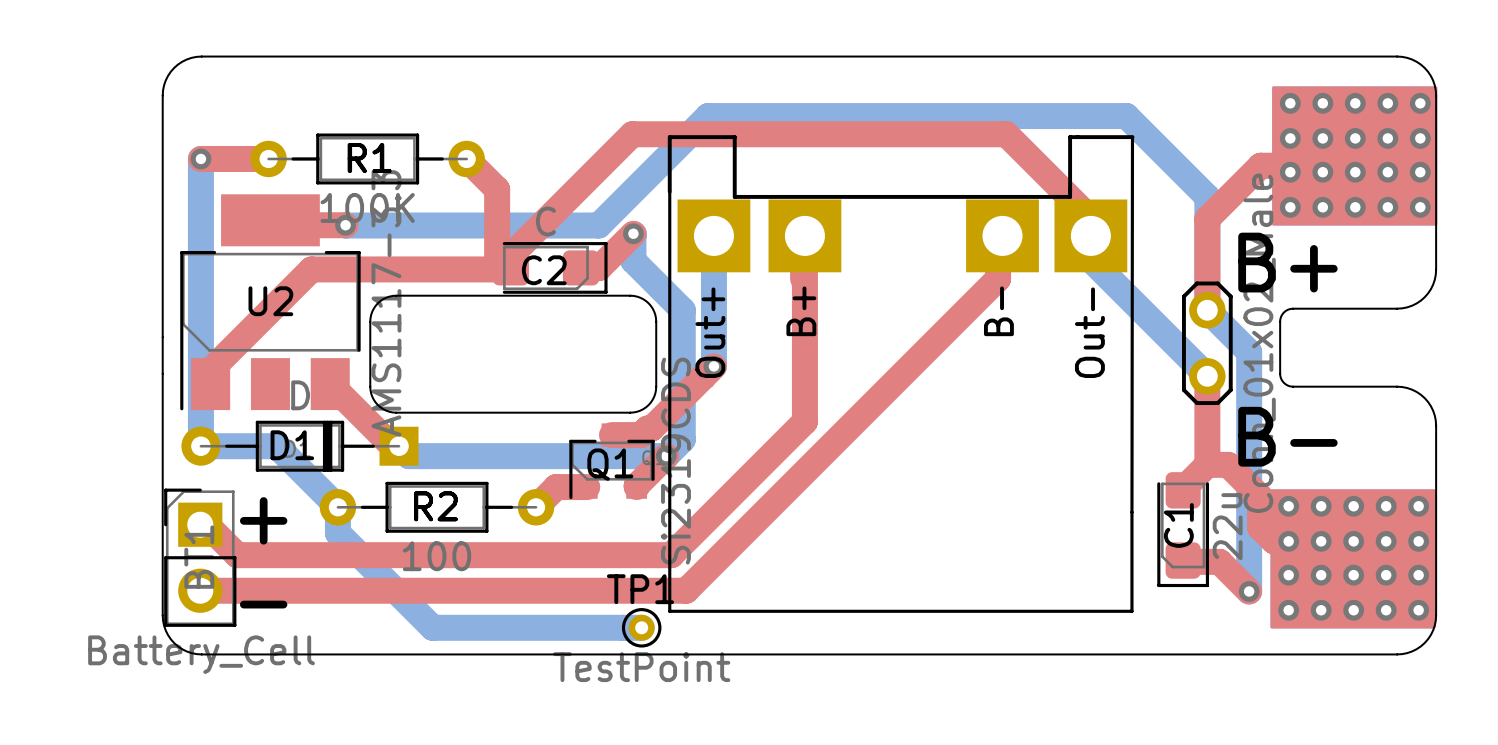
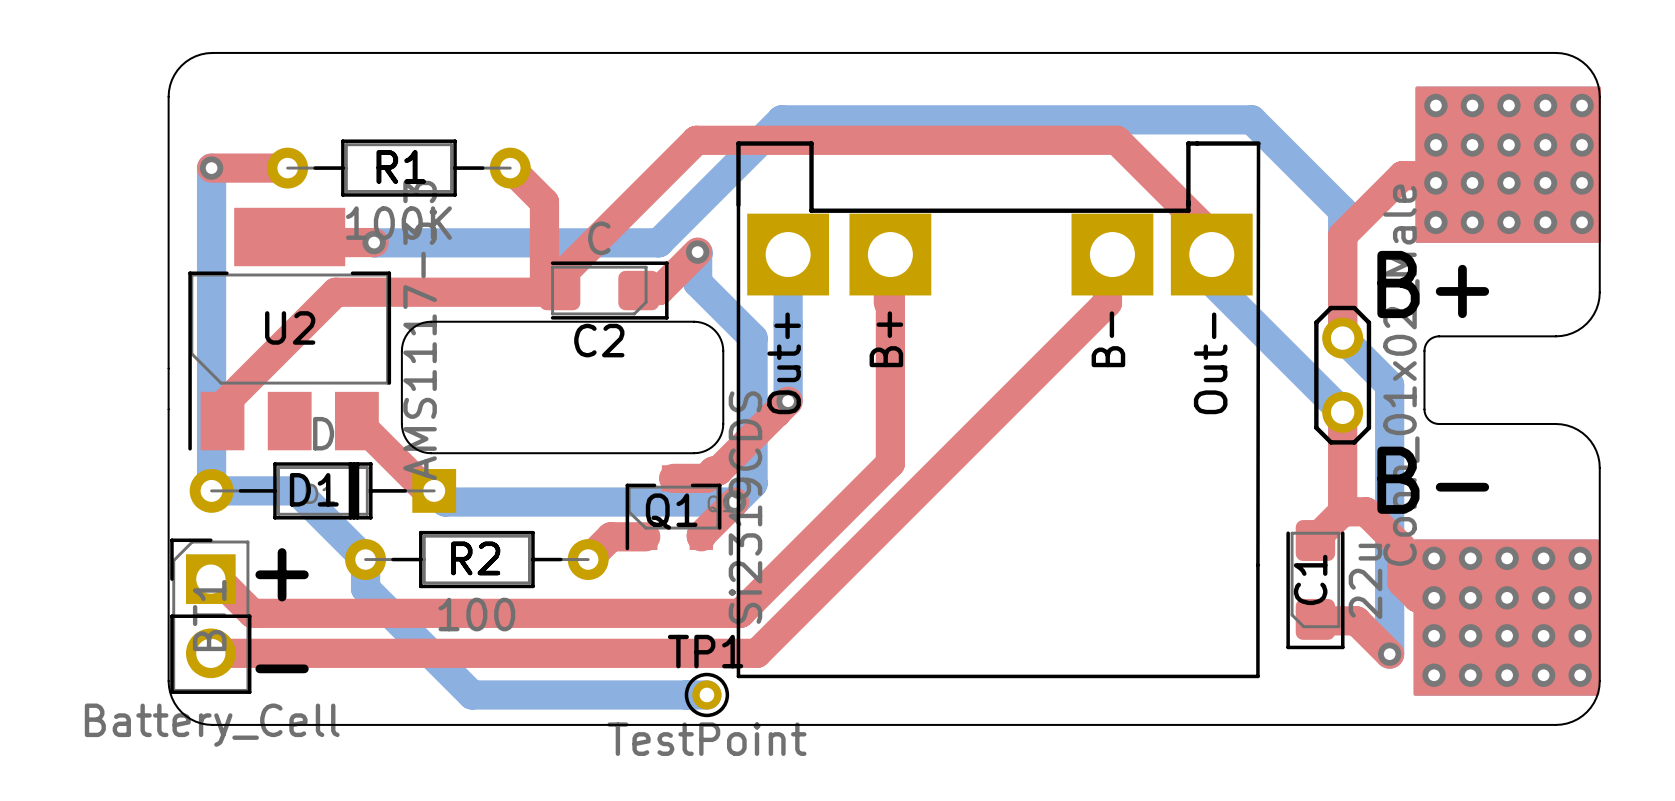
C2 name position: C2 (544, 270) -> C2 (599, 340)

